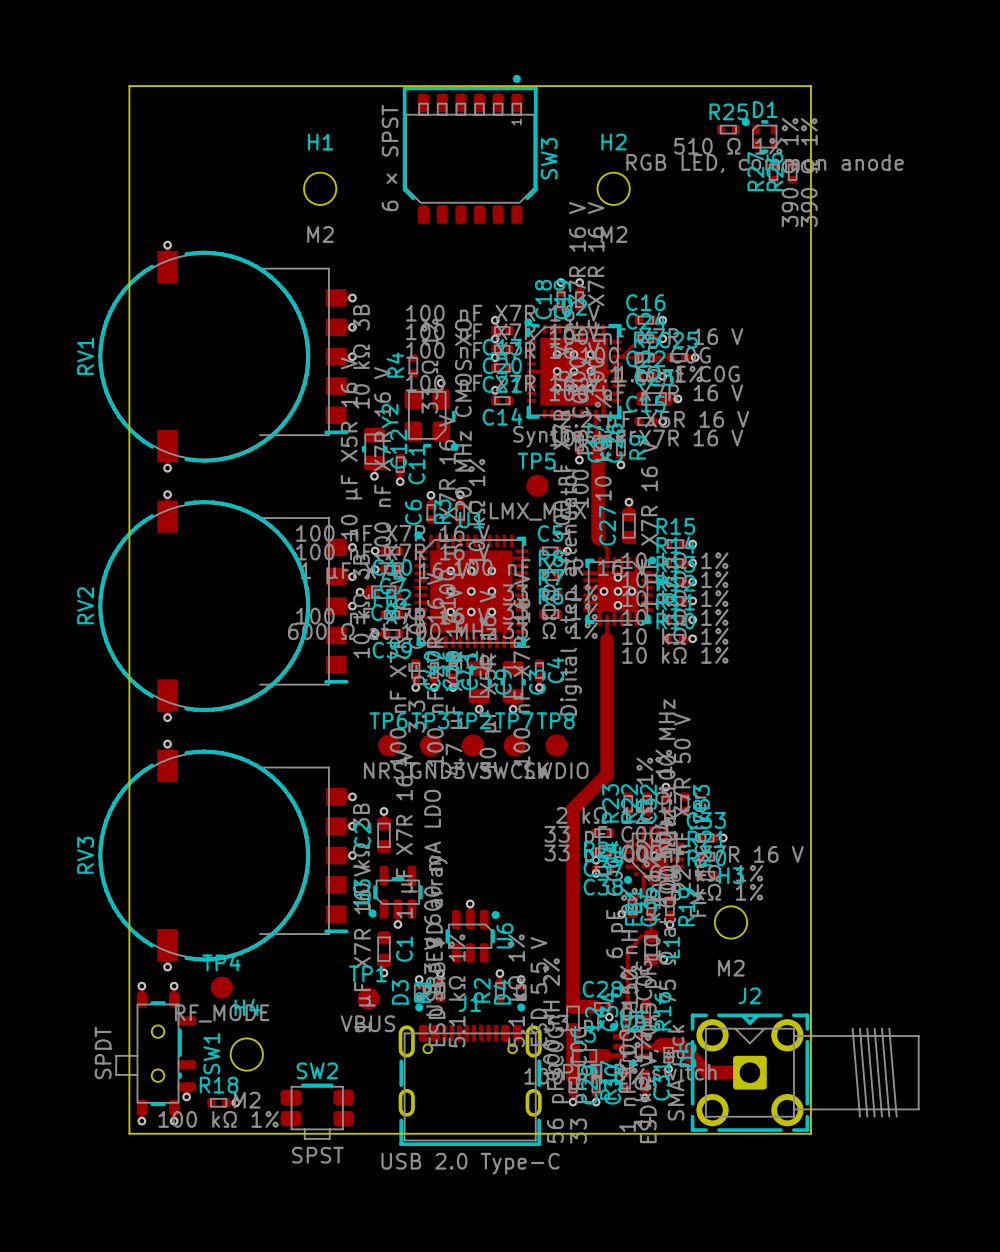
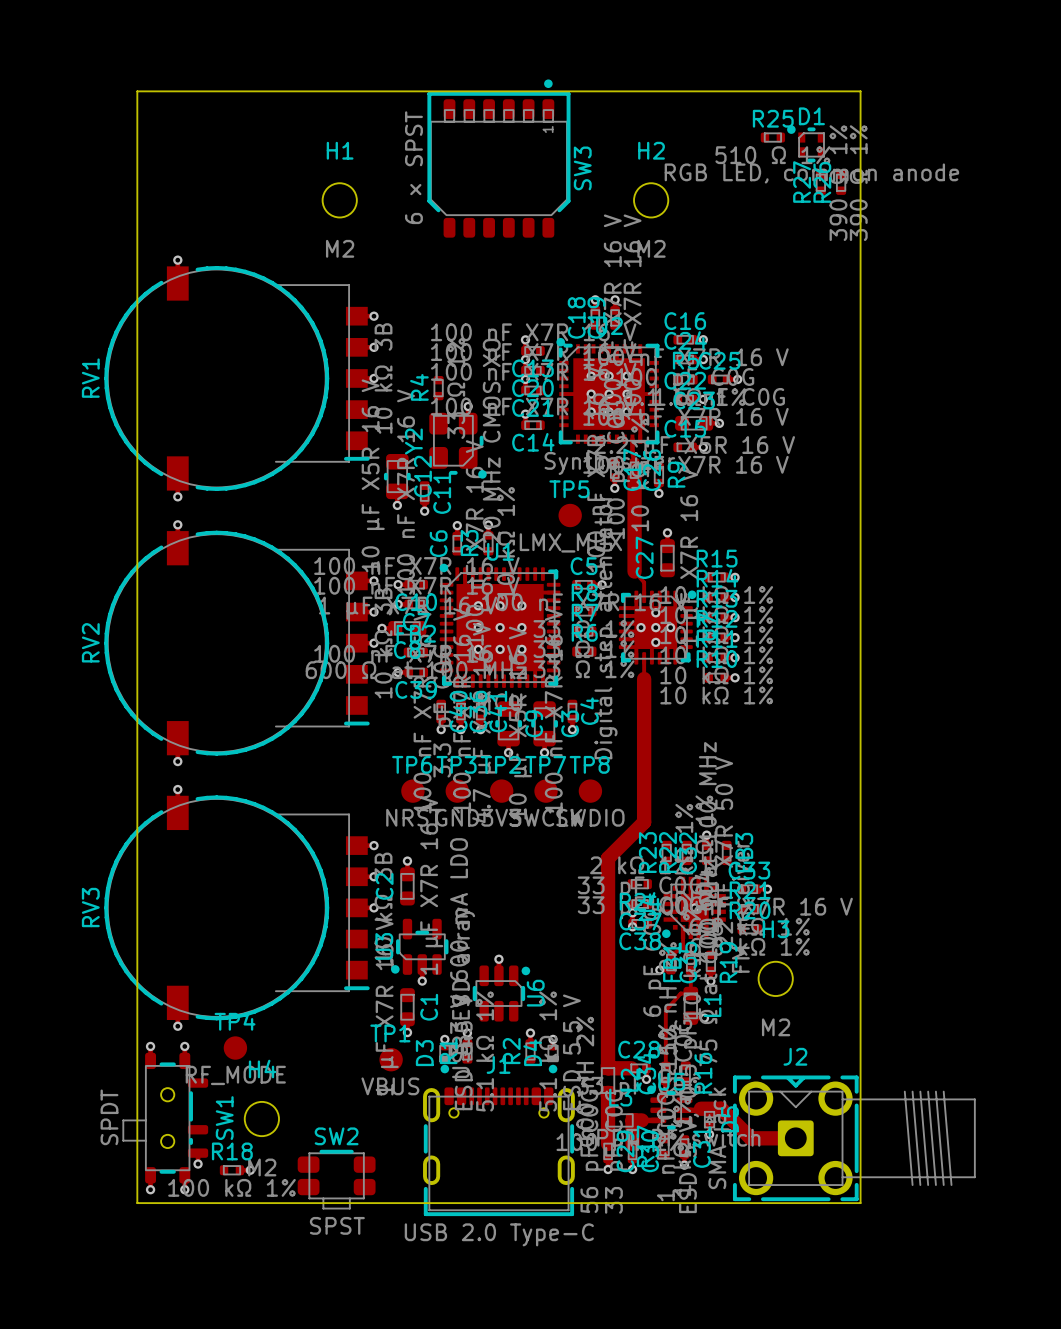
track: (638, 338) (621, 356) (616, 356) (638, 357) -> none
track: (653, 357) (671, 357) -> none

